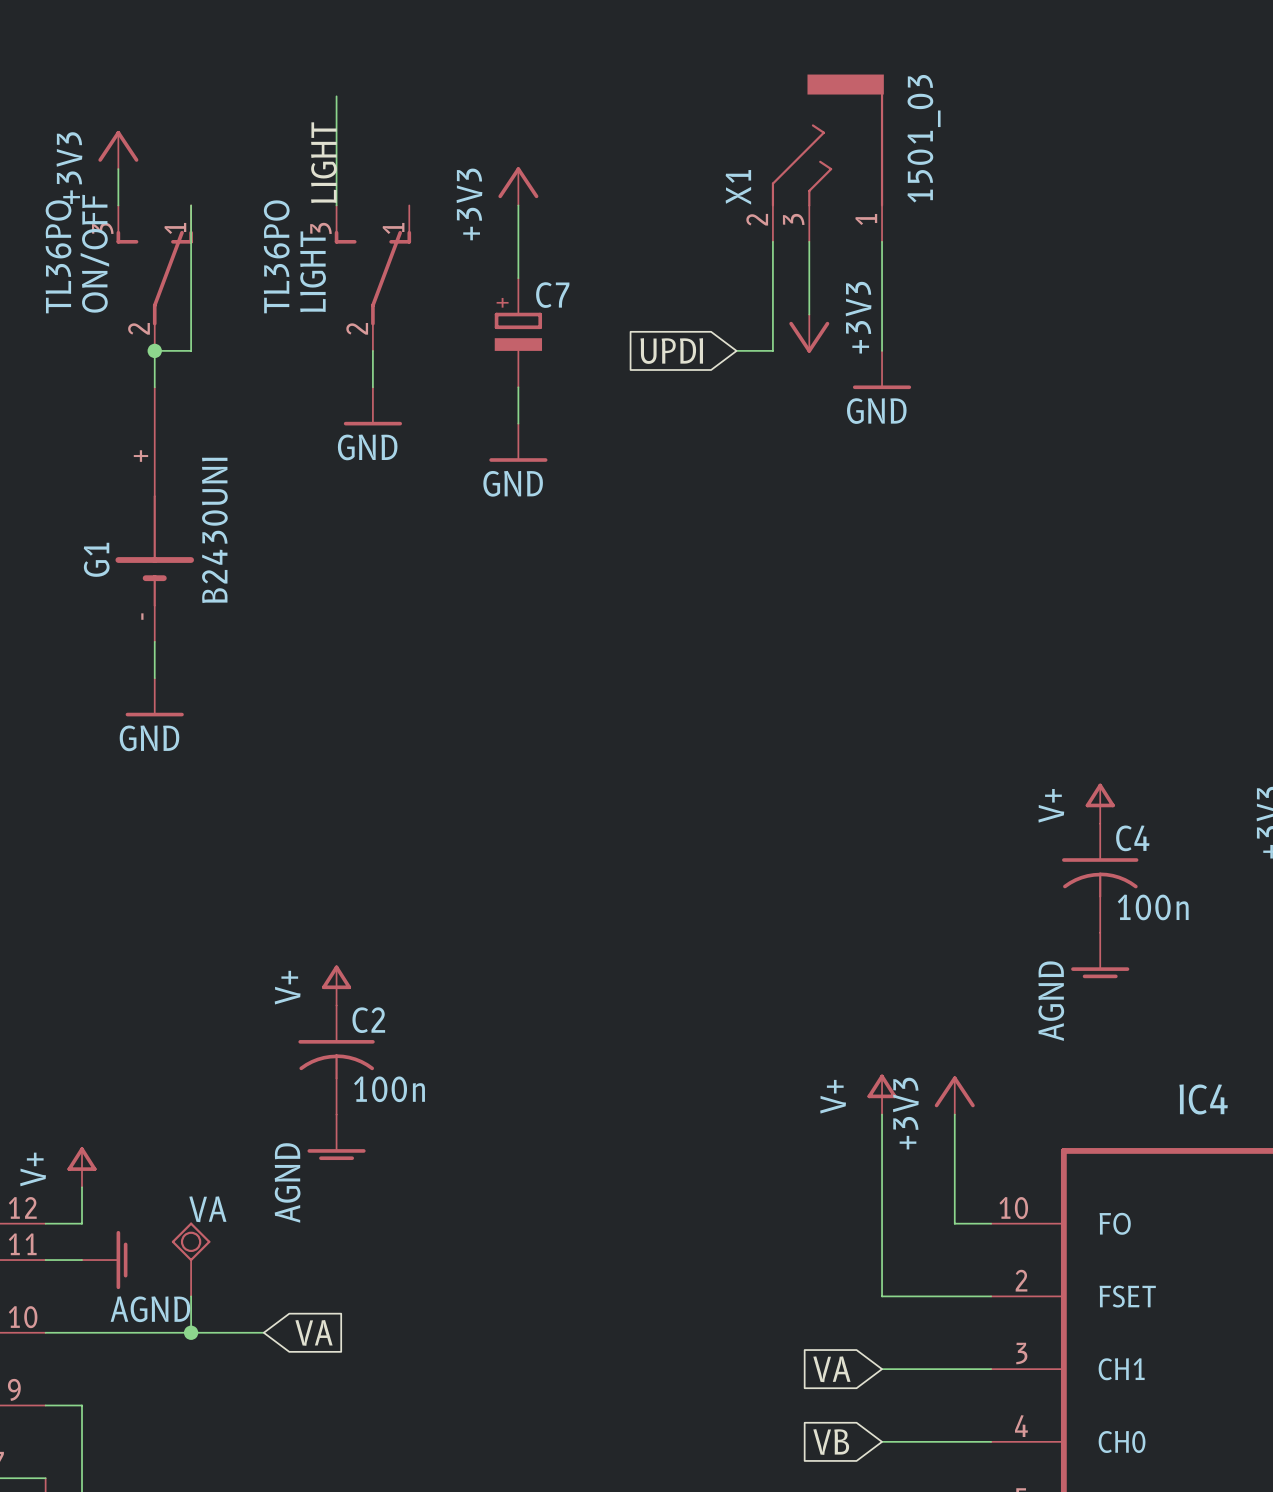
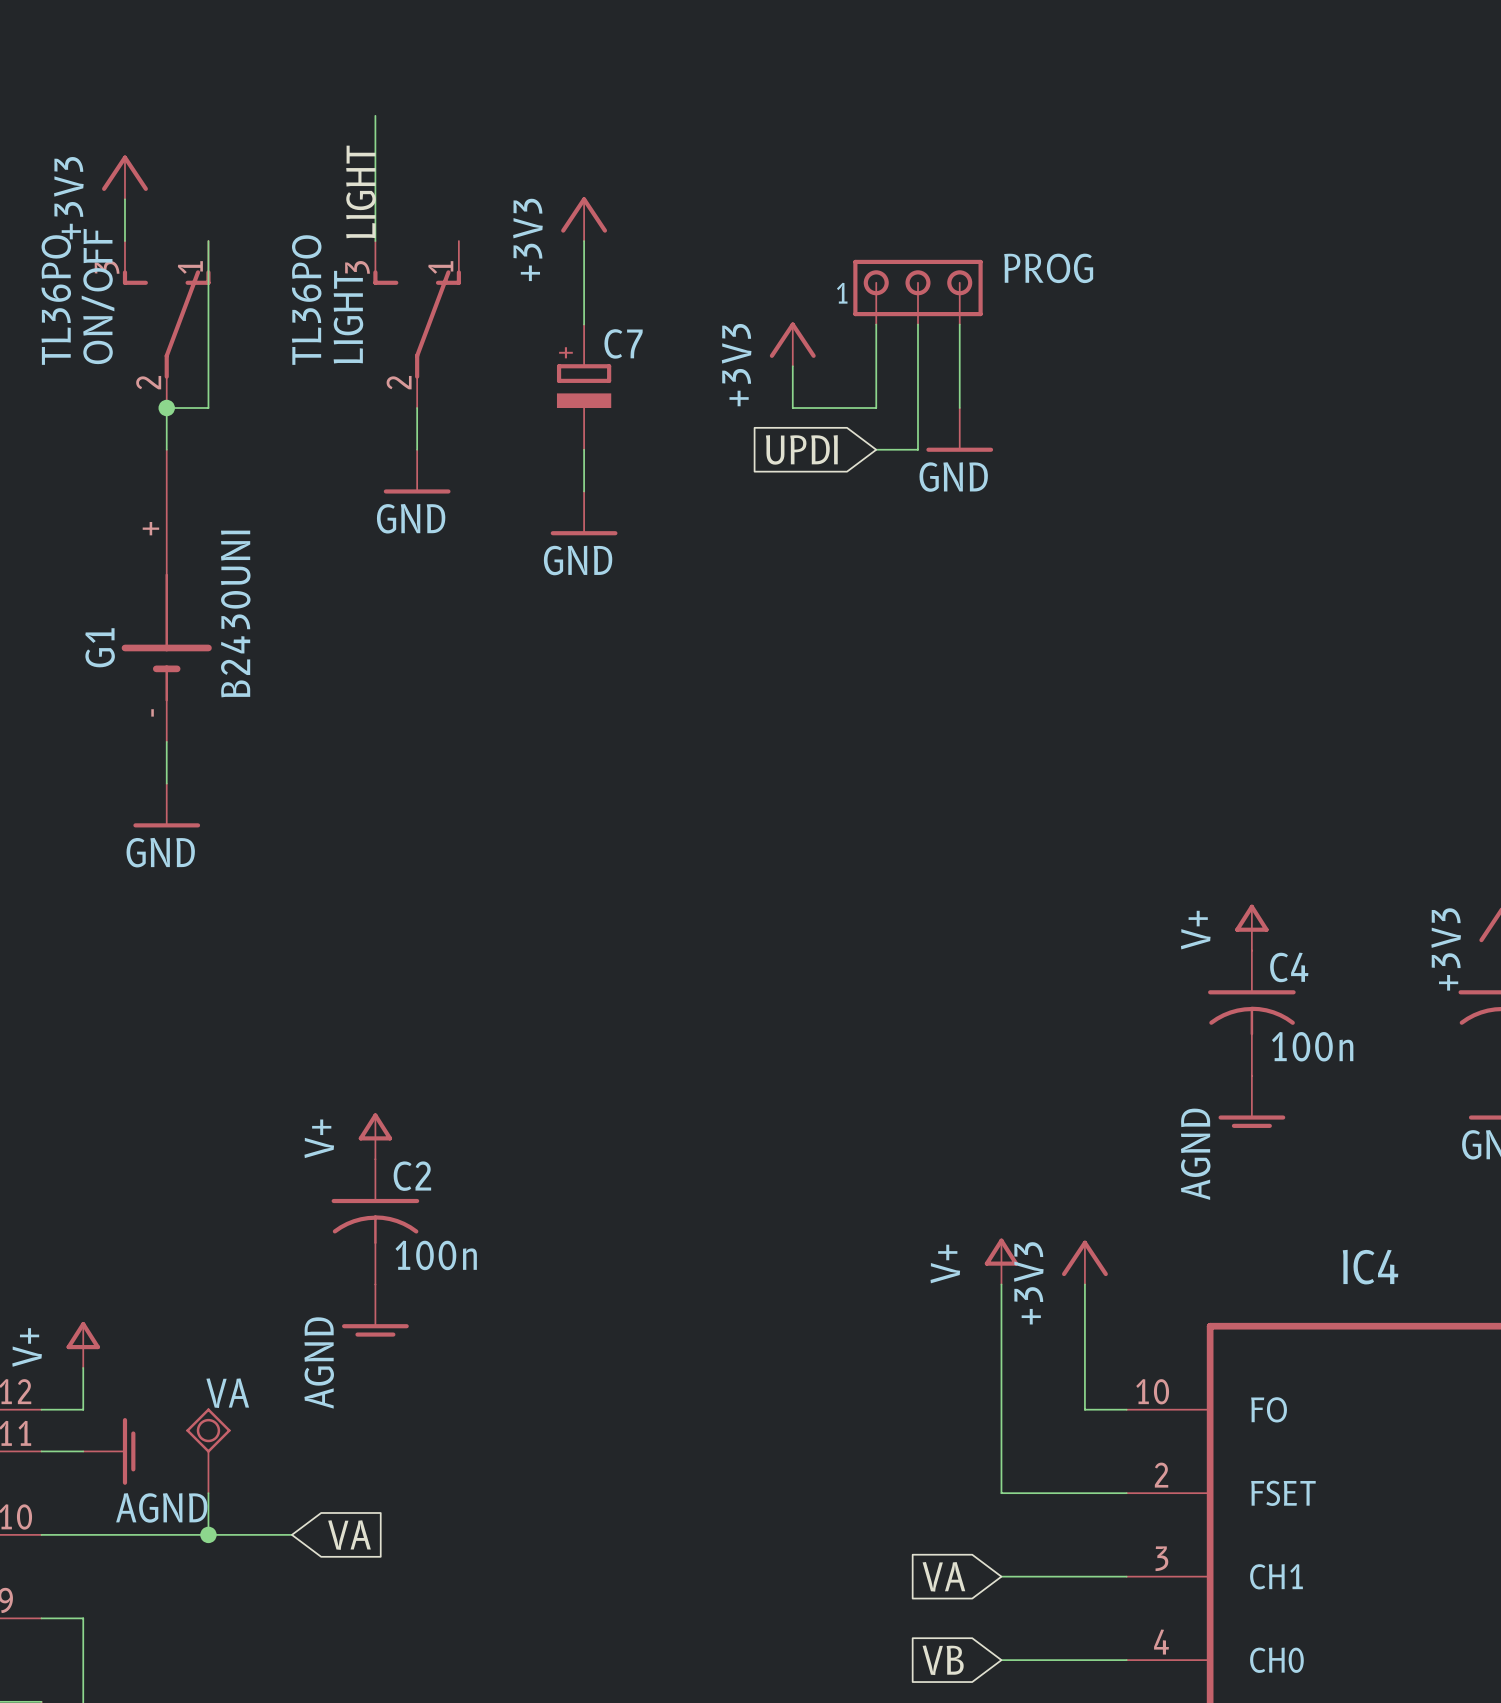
X1: 1501_03 (827, 158) -> none
wire: (882, 241) (882, 350) -> none
PROG: none -> (917, 292)
wire: none -> (959, 324) (959, 408)
wire: none -> (792, 366) (792, 408) (834, 408)
wire: none -> (917, 366) (917, 449) (876, 449)
power symbol position: +3V3 (809, 333) -> +3V3 (792, 344)
power symbol rotation: 0° (809, 337) -> 180° (792, 340)
global label position: UPDI (671, 351) -> UPDI (801, 449)
power symbol position: GND (882, 369) -> GND (959, 429)

